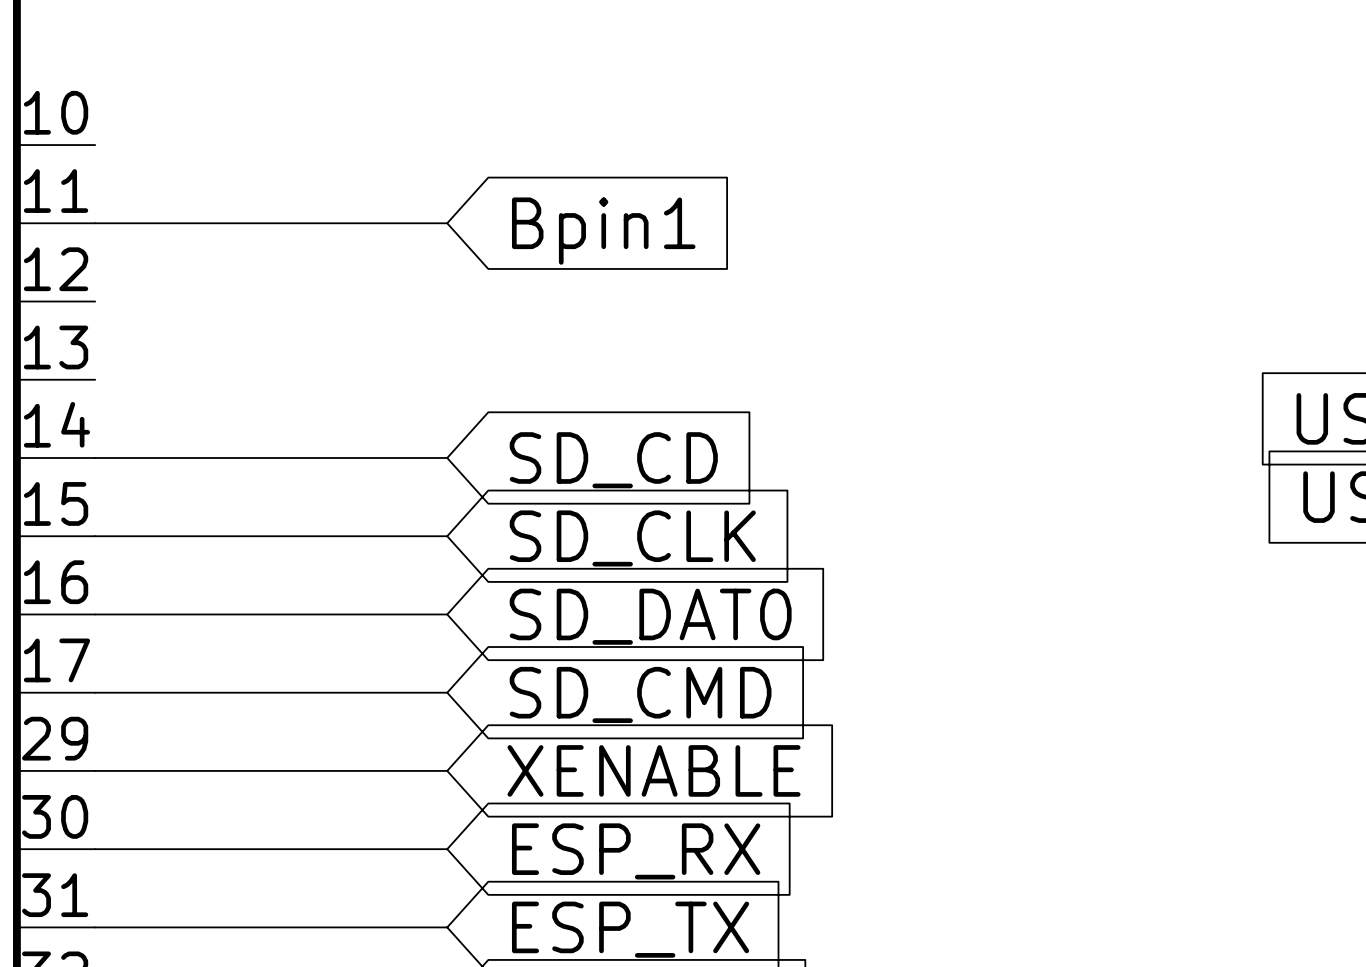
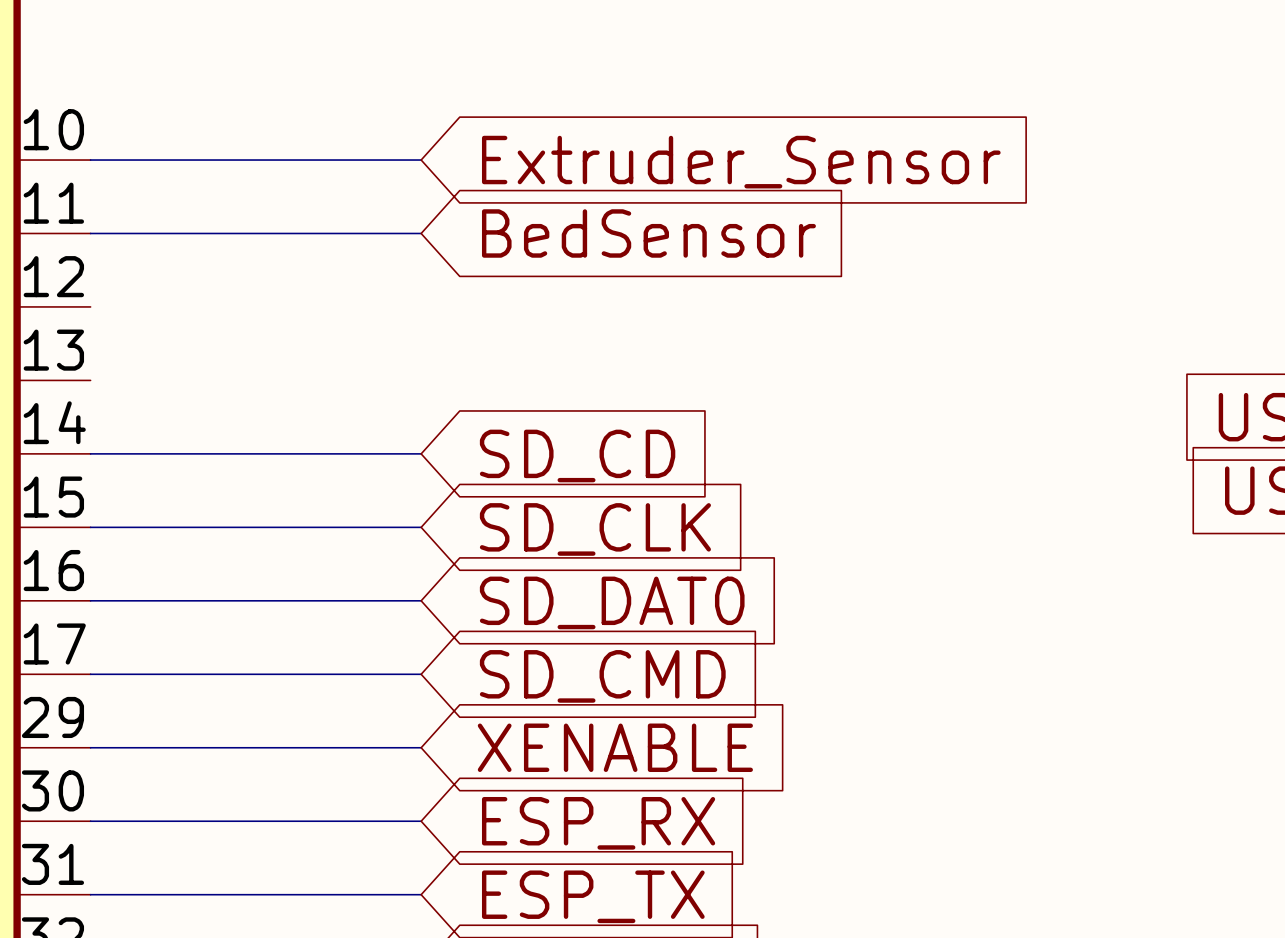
wire: none -> (90, 160) (421, 160)
global label: none -> Extruder_Sensor (741, 162)
global label: Bpin1 (603, 231) -> BedSensor (648, 233)

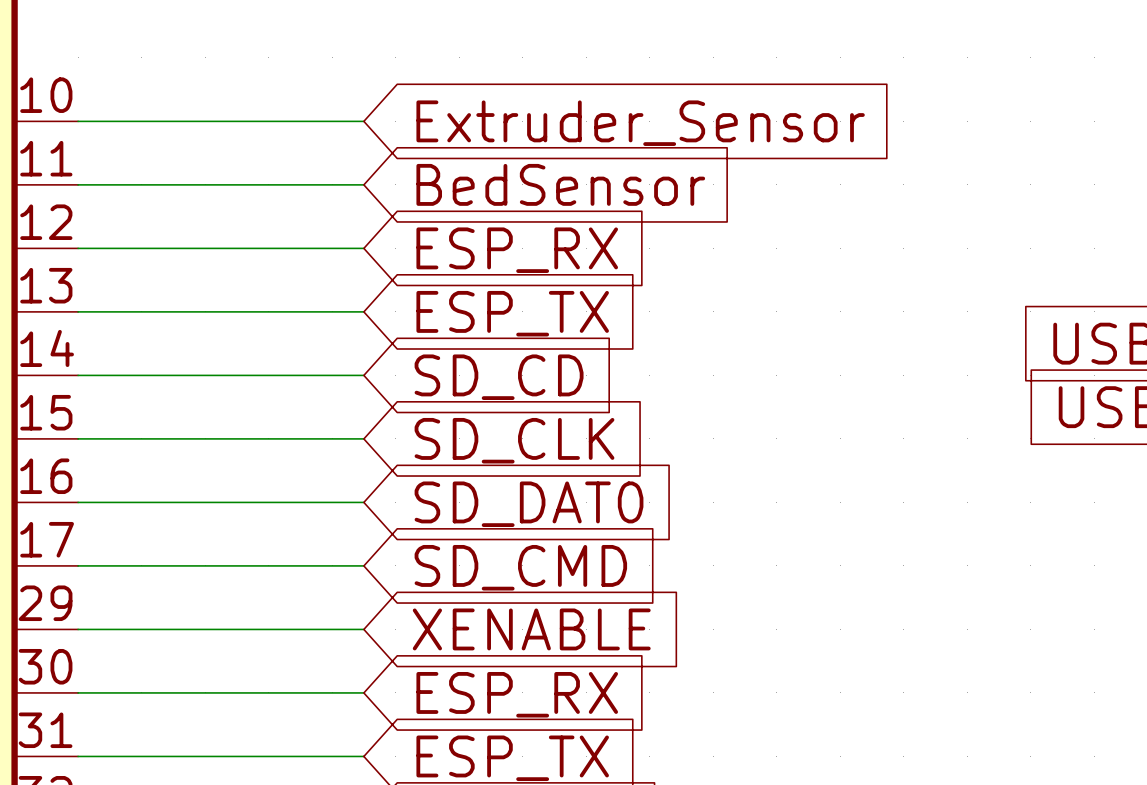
wire: none -> (78, 248) (363, 248)
global label: none -> ESP_RX (517, 250)
wire: none -> (78, 311) (363, 311)
global label: none -> ESP_TX (512, 313)

